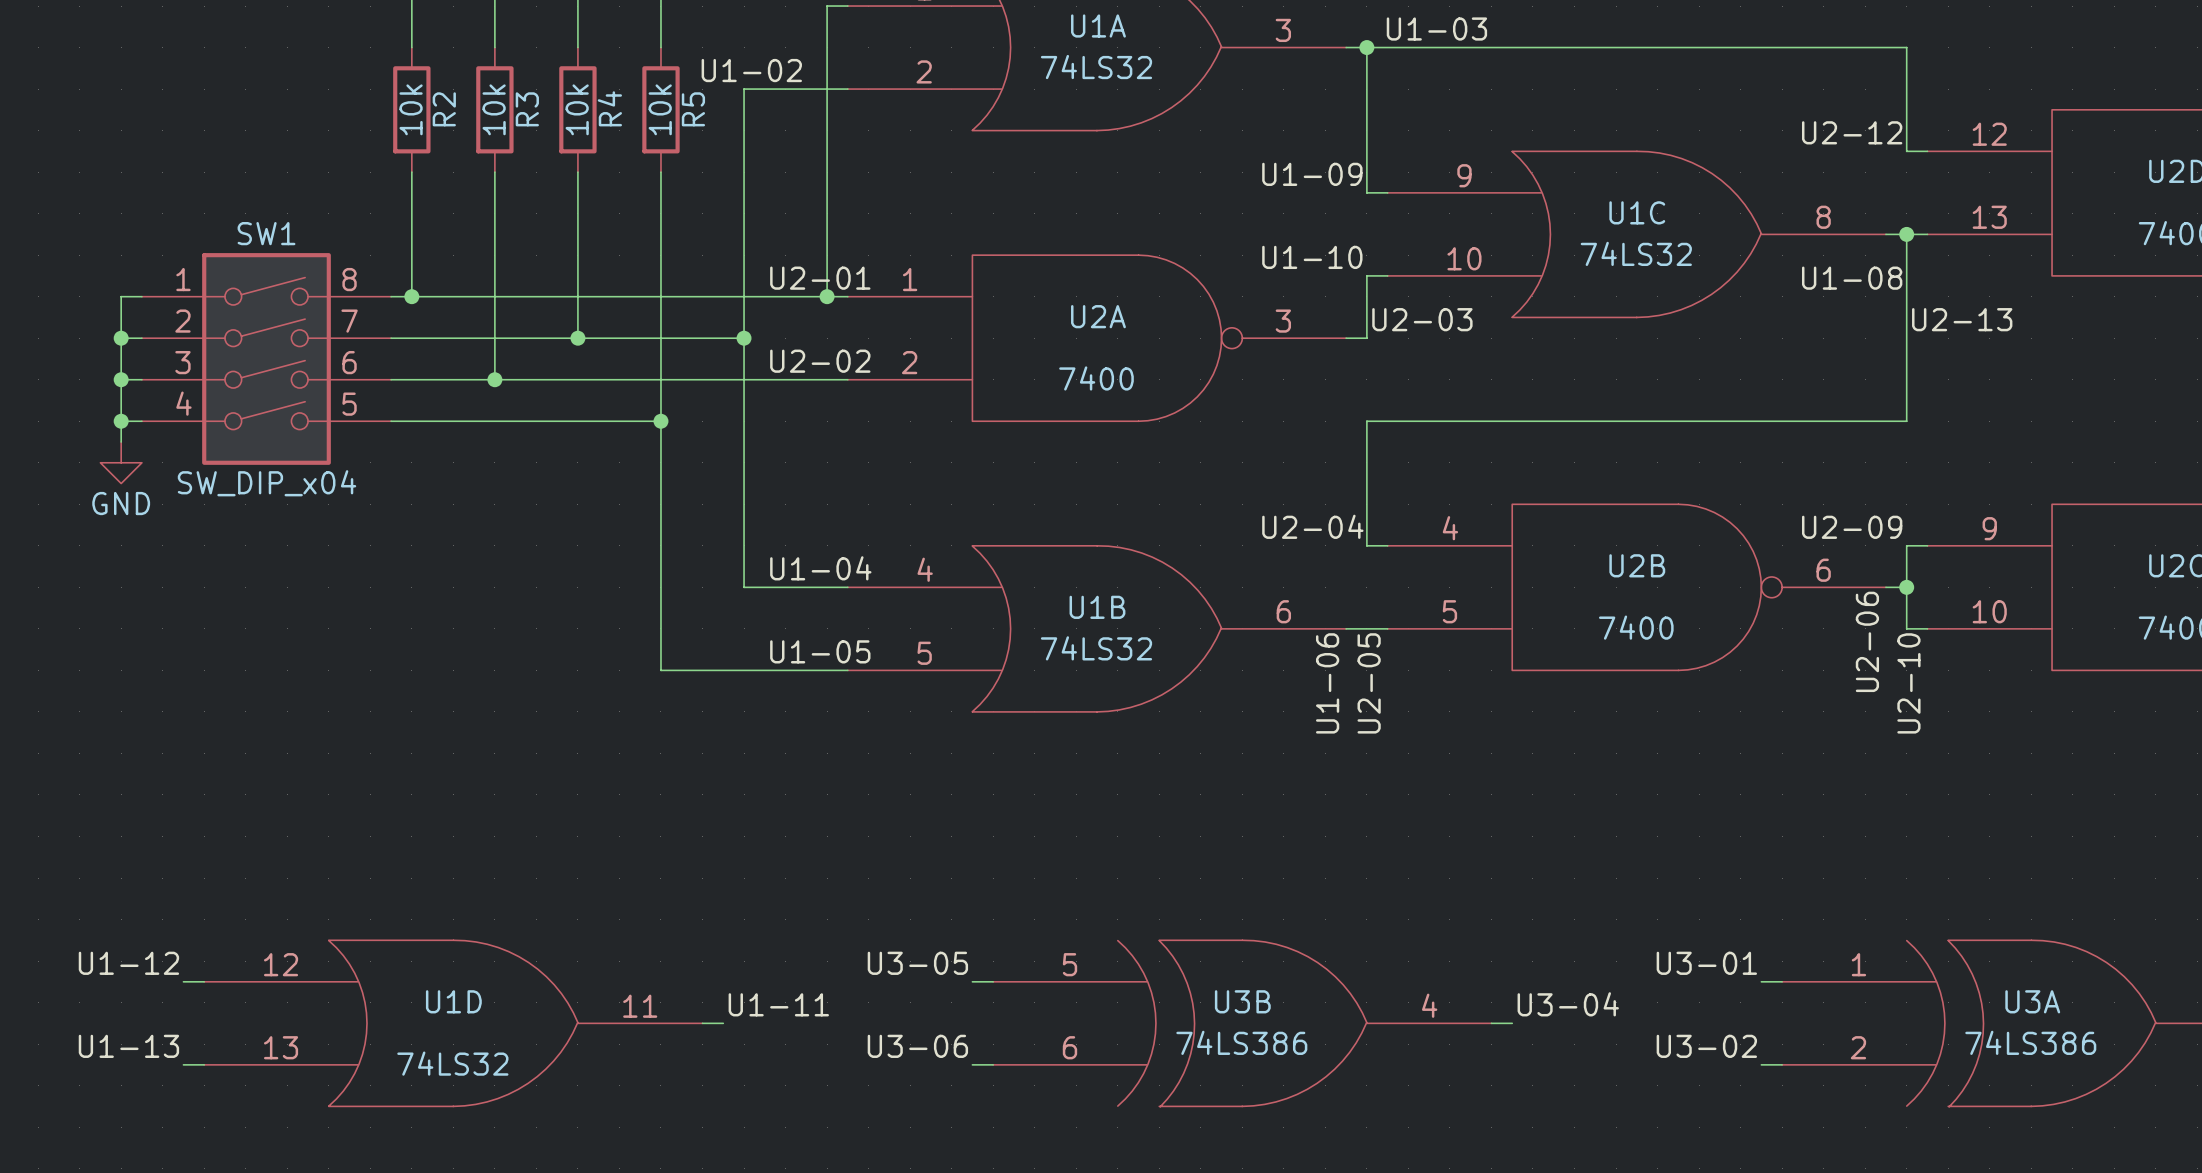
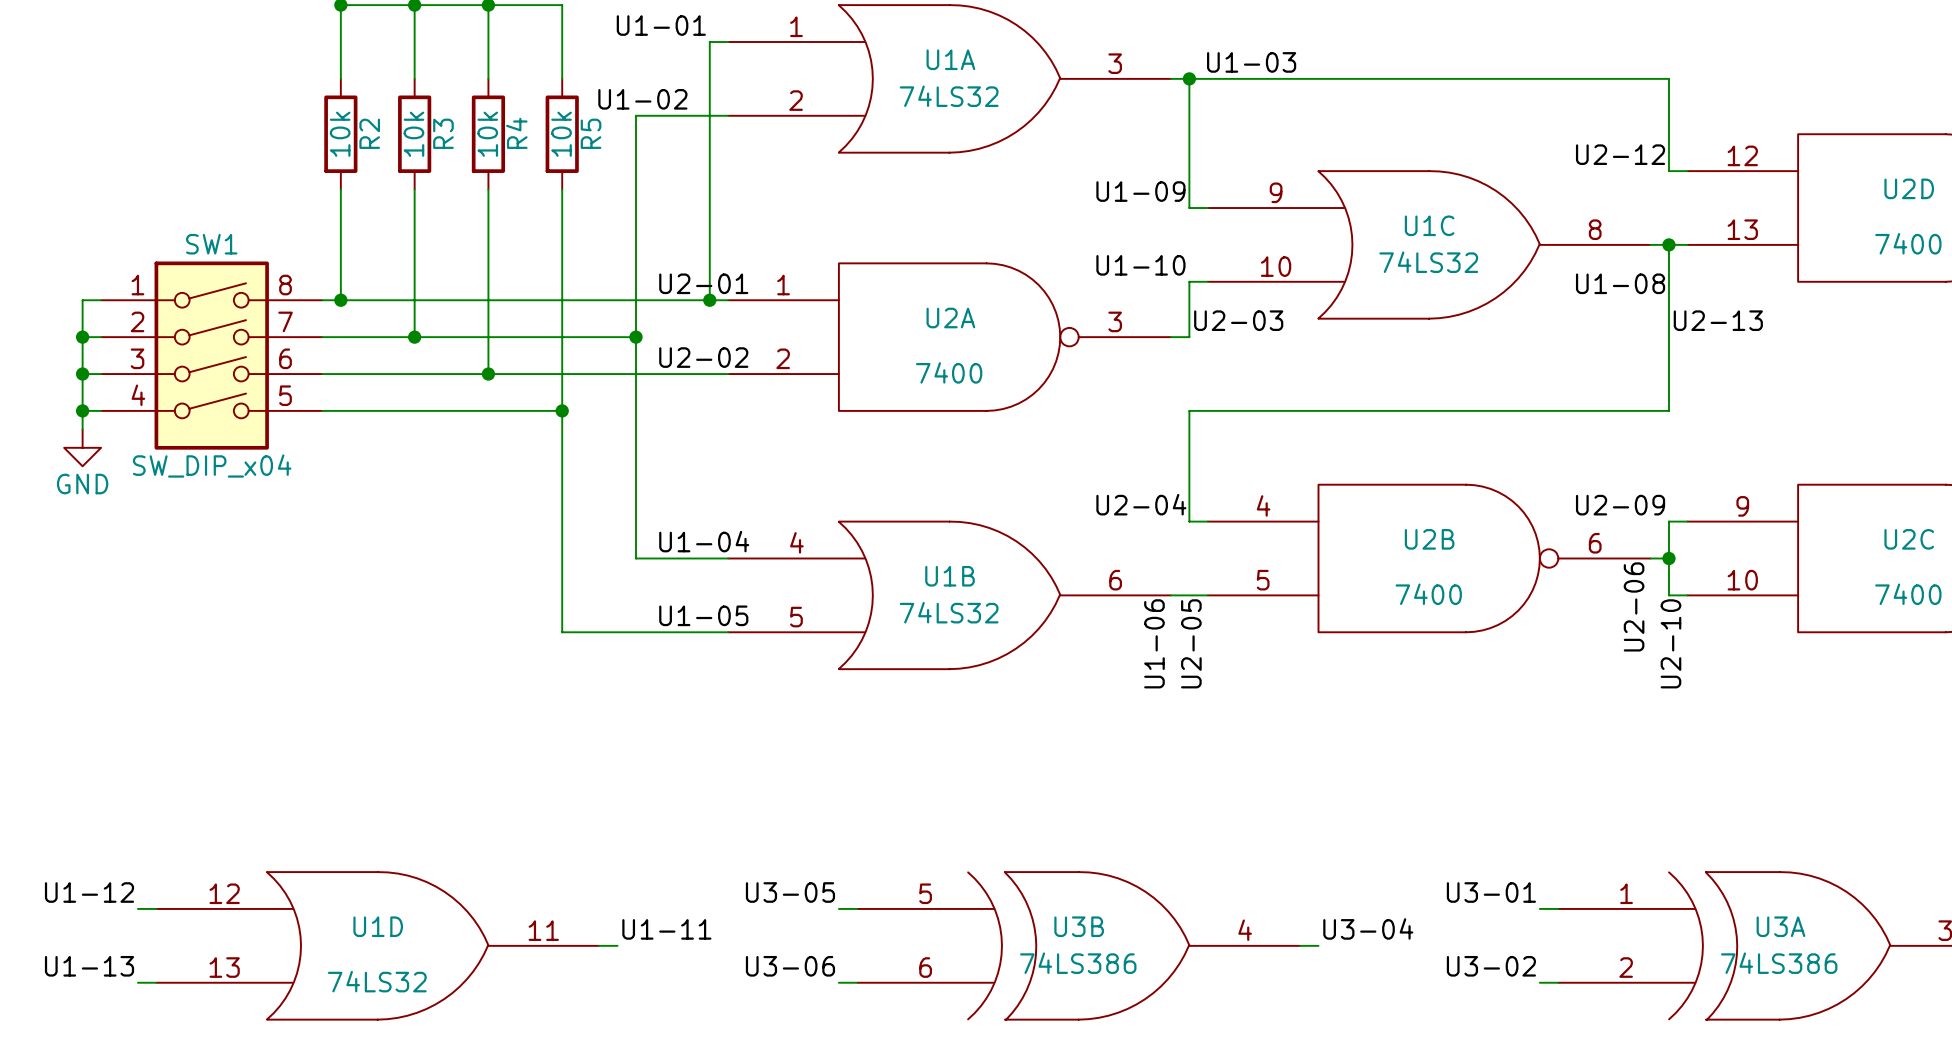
wire: (494, 338) (494, 379) -> (488, 337) (488, 374)
junction: none -> (414, 337)
junction: (577, 338) -> none
junction: (494, 379) -> none
junction: none -> (488, 374)

